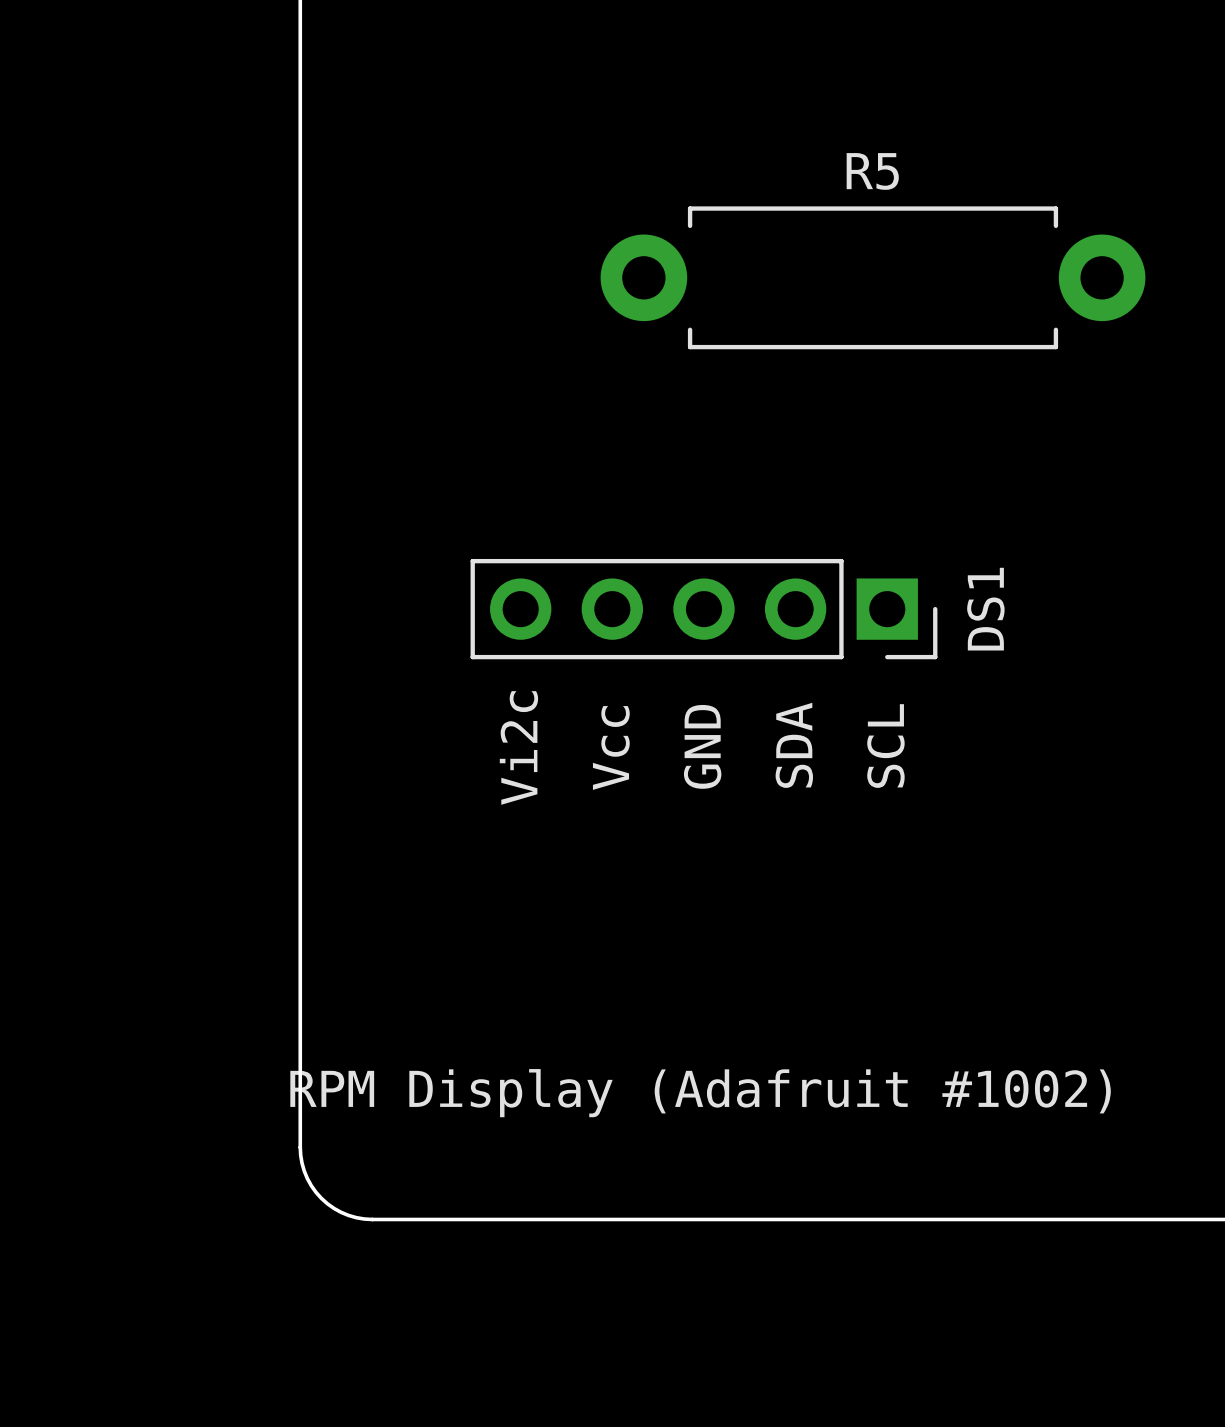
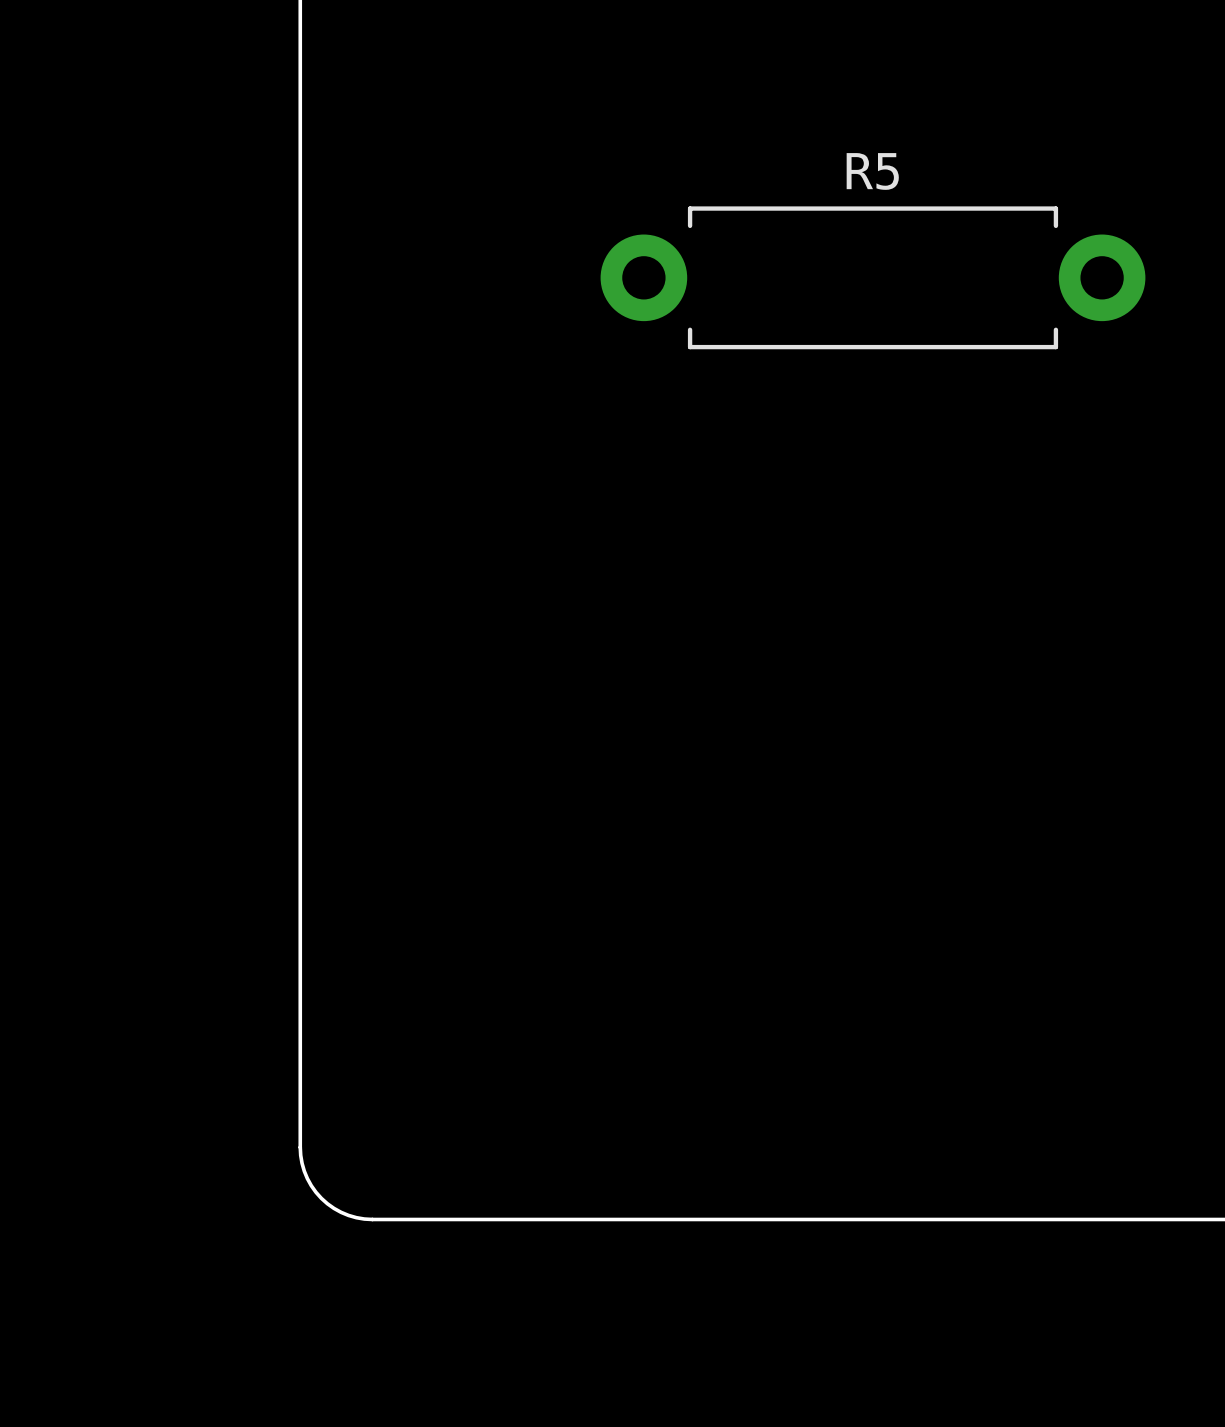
DS1: (703, 609) -> none

